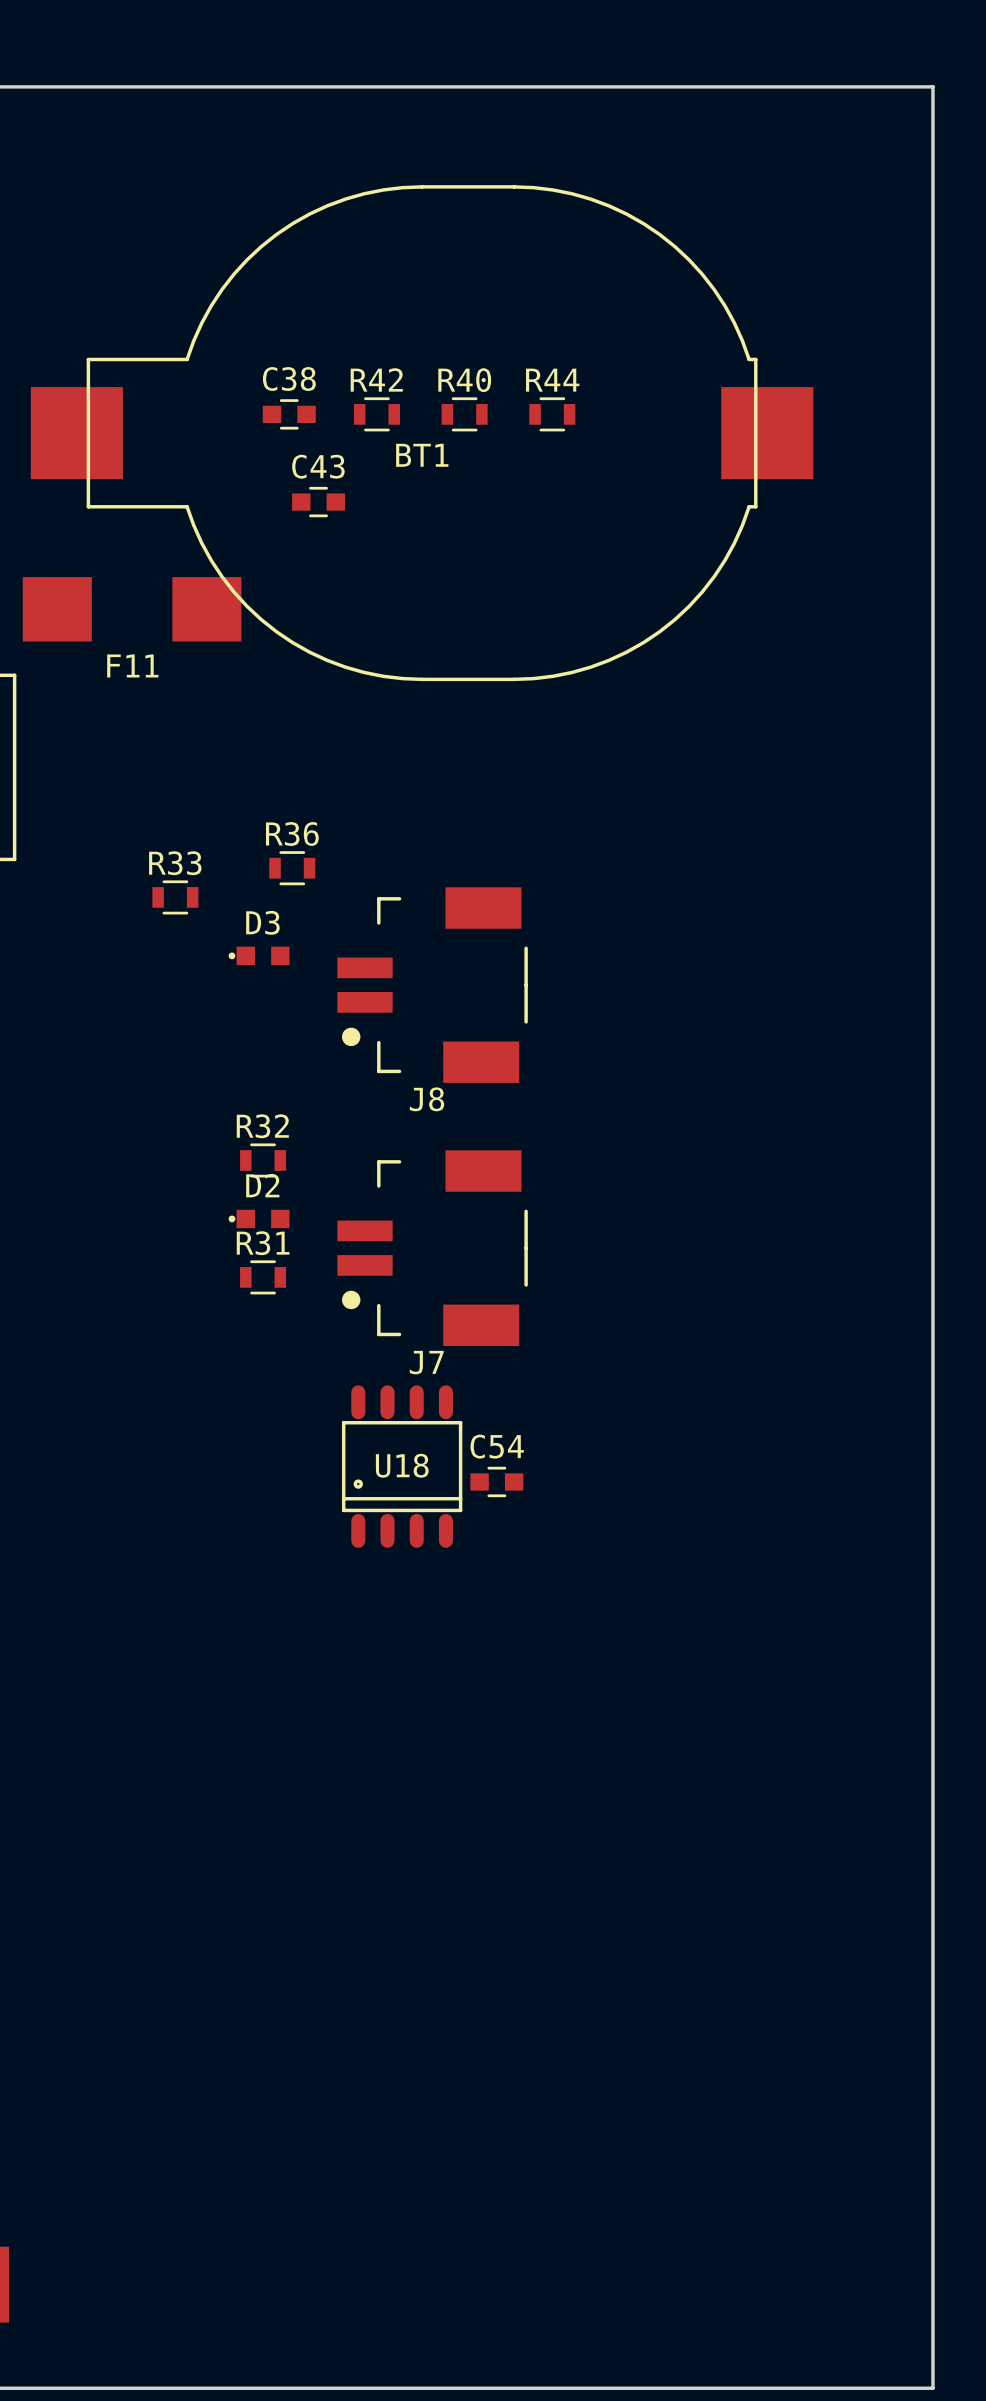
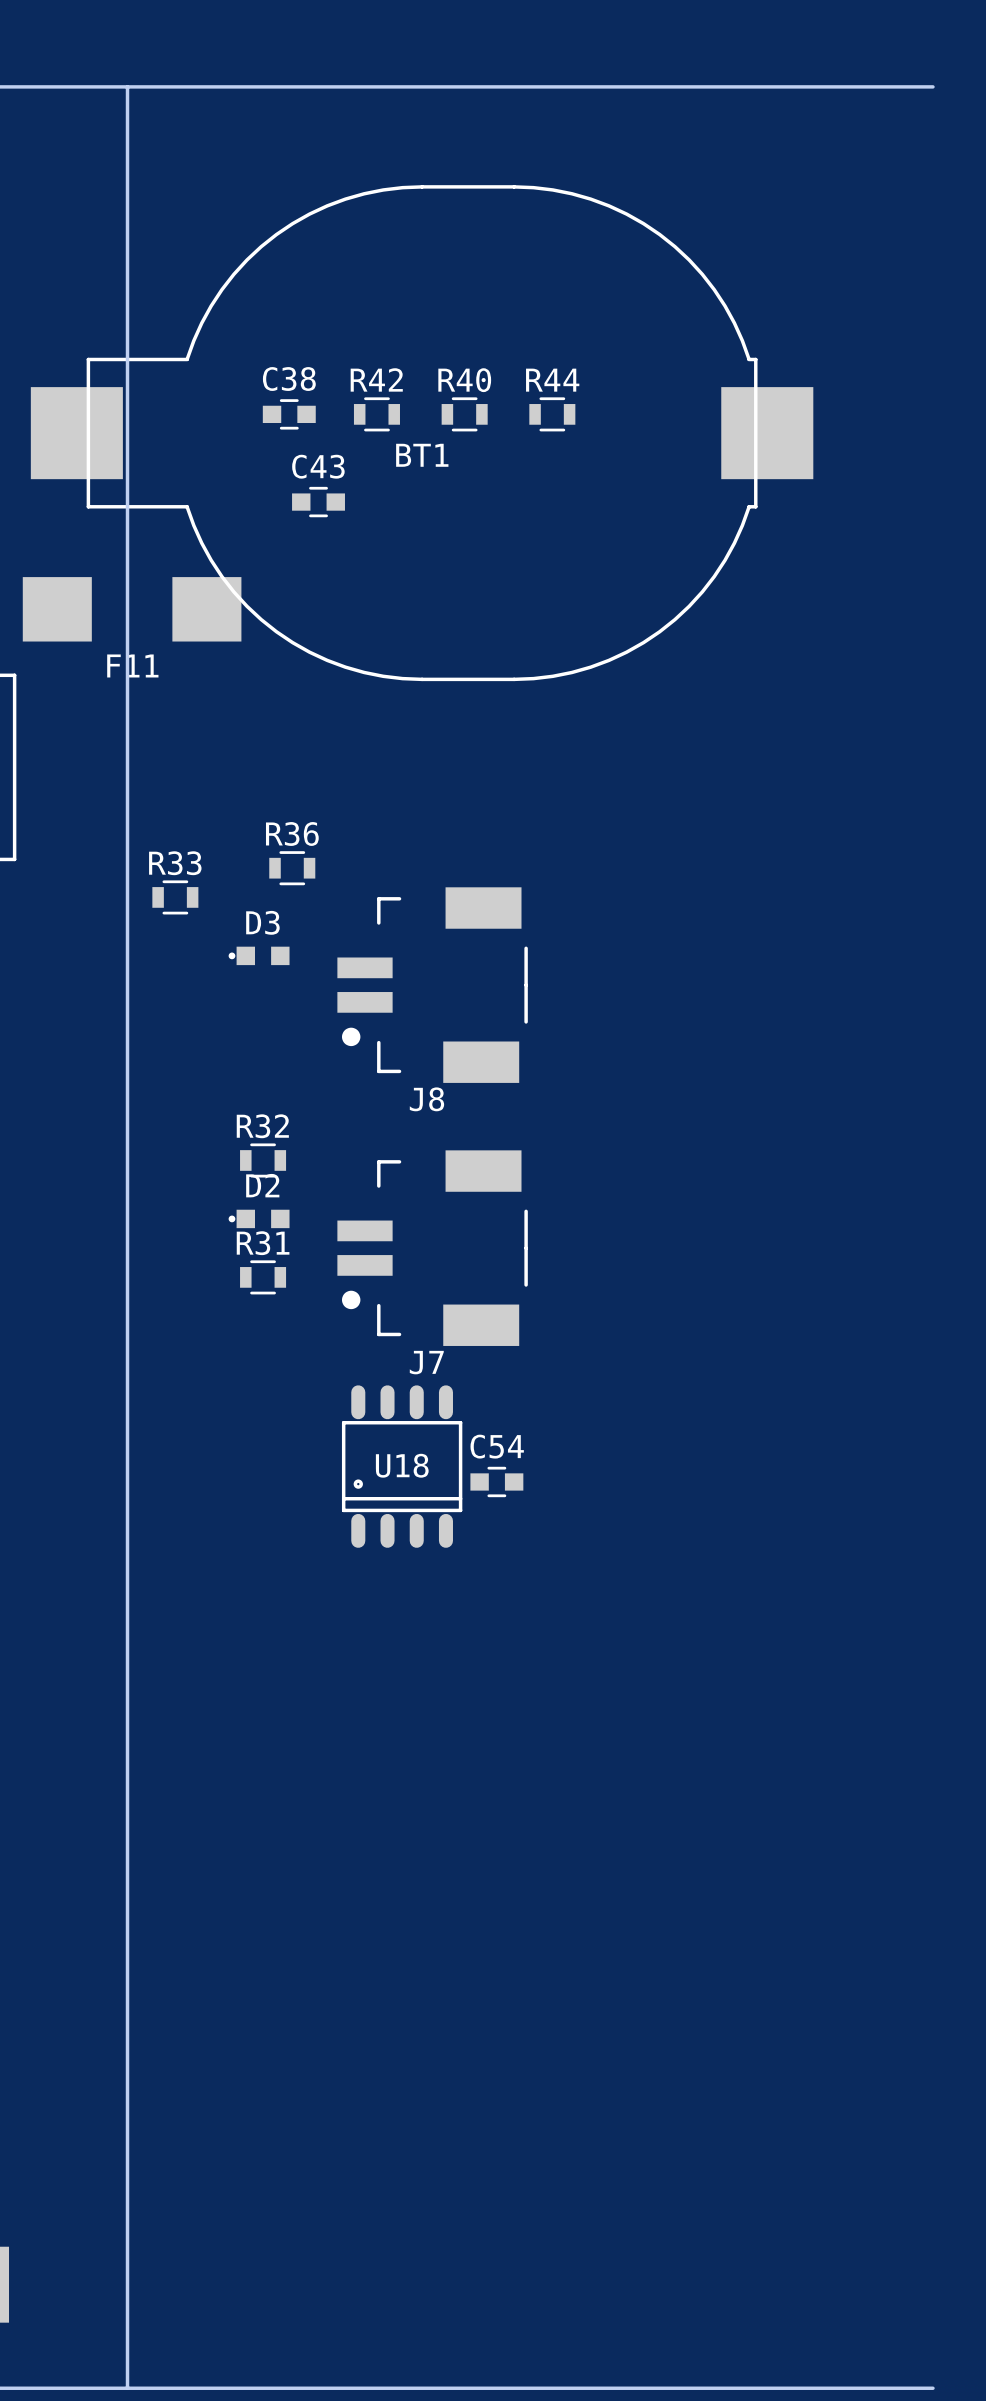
board edge: none -> (127, 86) (127, 2388)
board edge: (932, 86) (932, 2388) -> none

